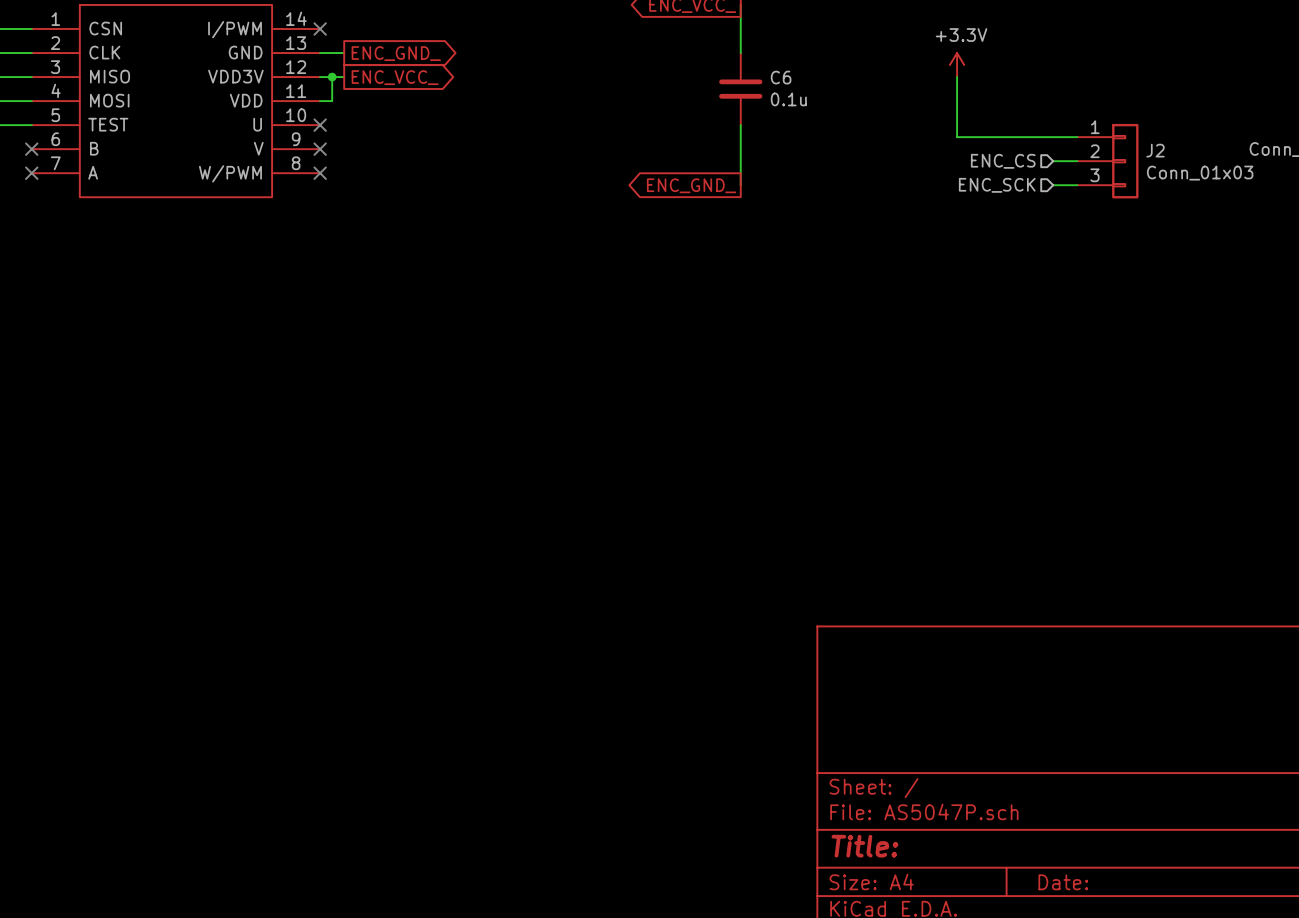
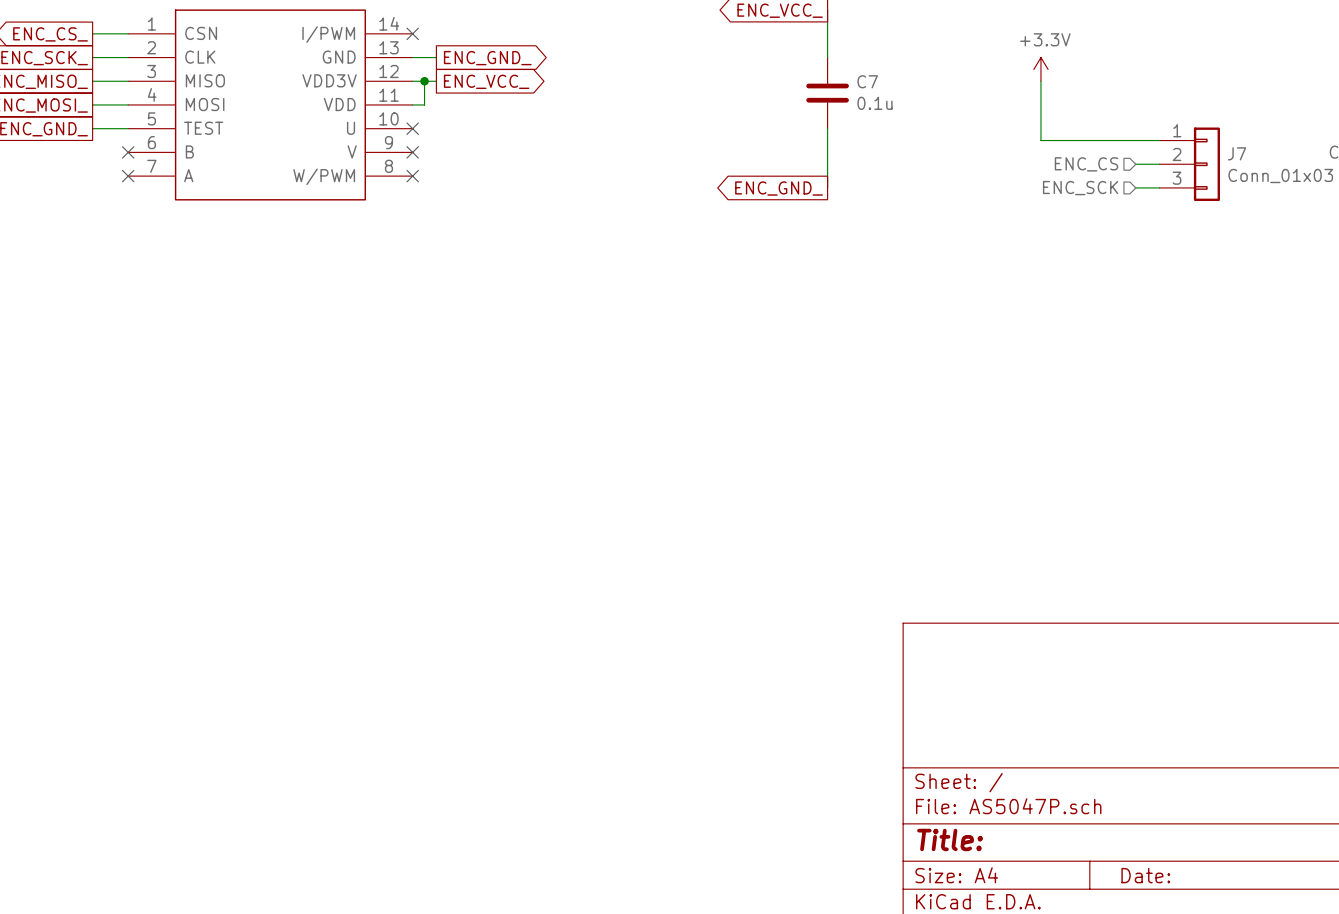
C6 name: C6 (781, 77) -> C7 (867, 81)
J2 name: J2 (1155, 150) -> J7 (1237, 153)

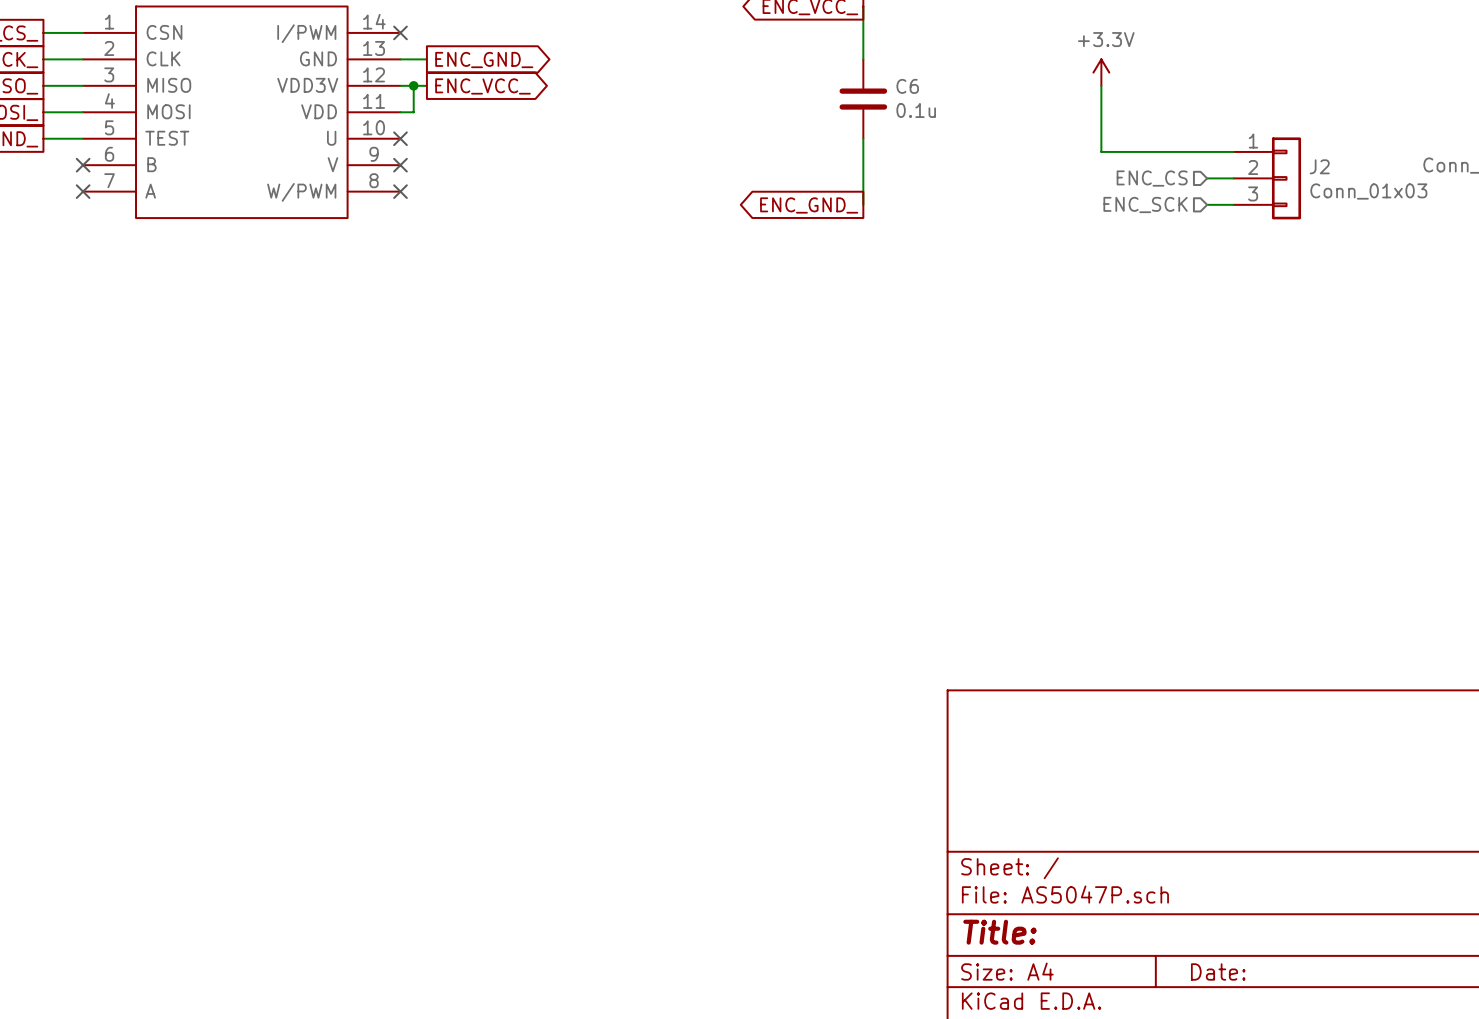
C7 name: C7 (867, 81) -> C6 (907, 86)
J7 name: J7 (1237, 153) -> J2 (1319, 166)

